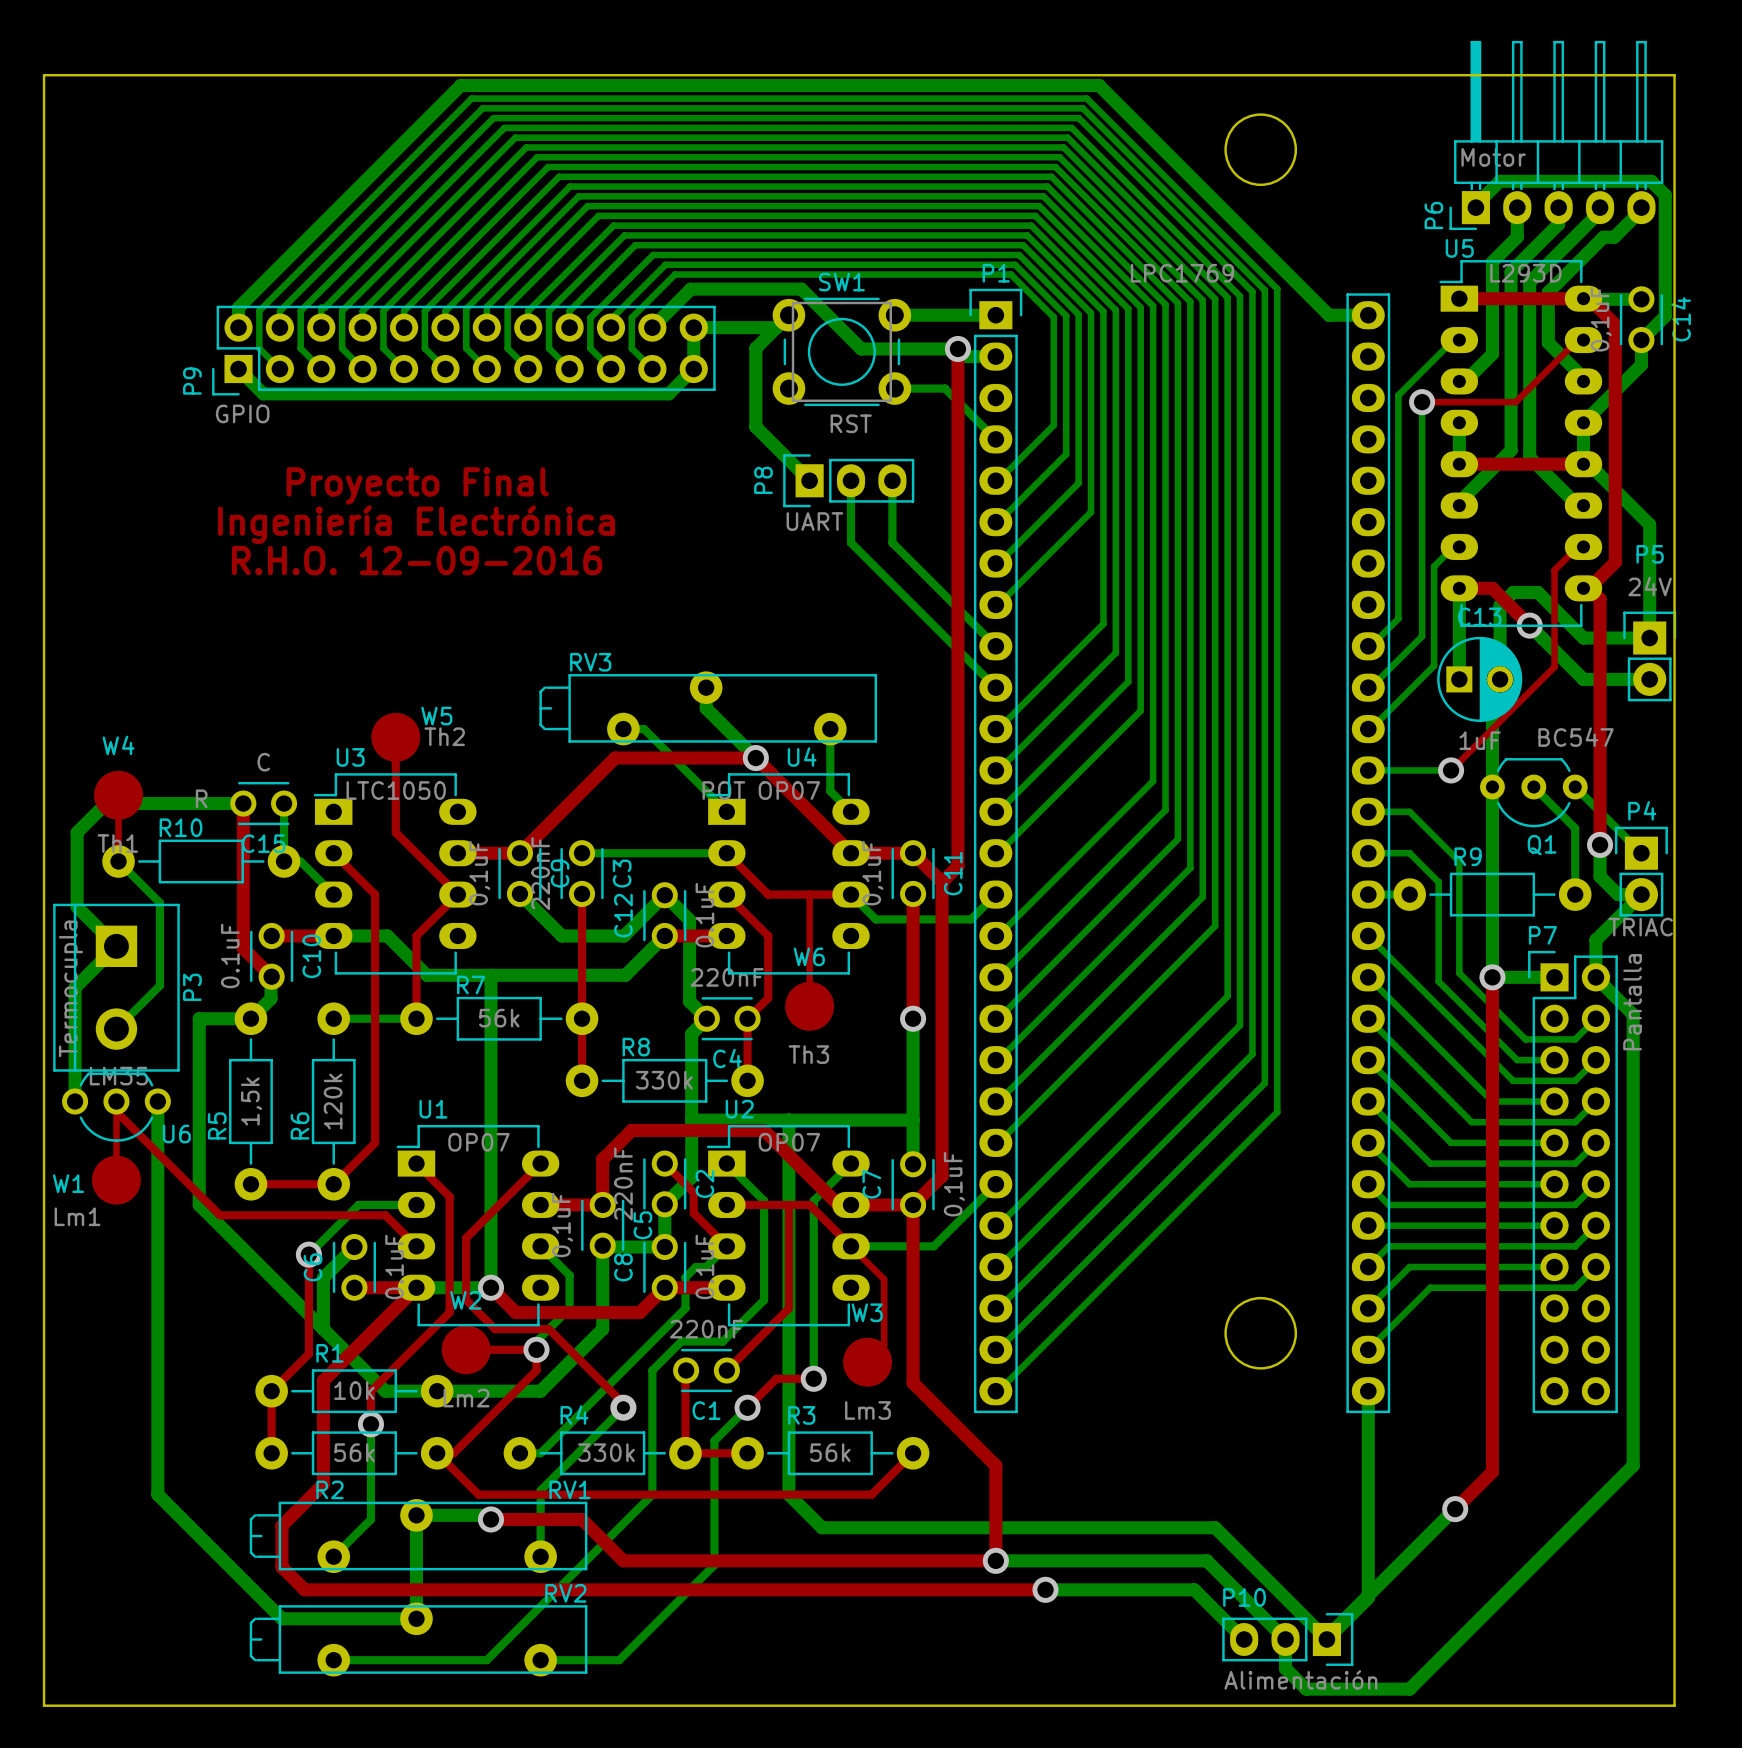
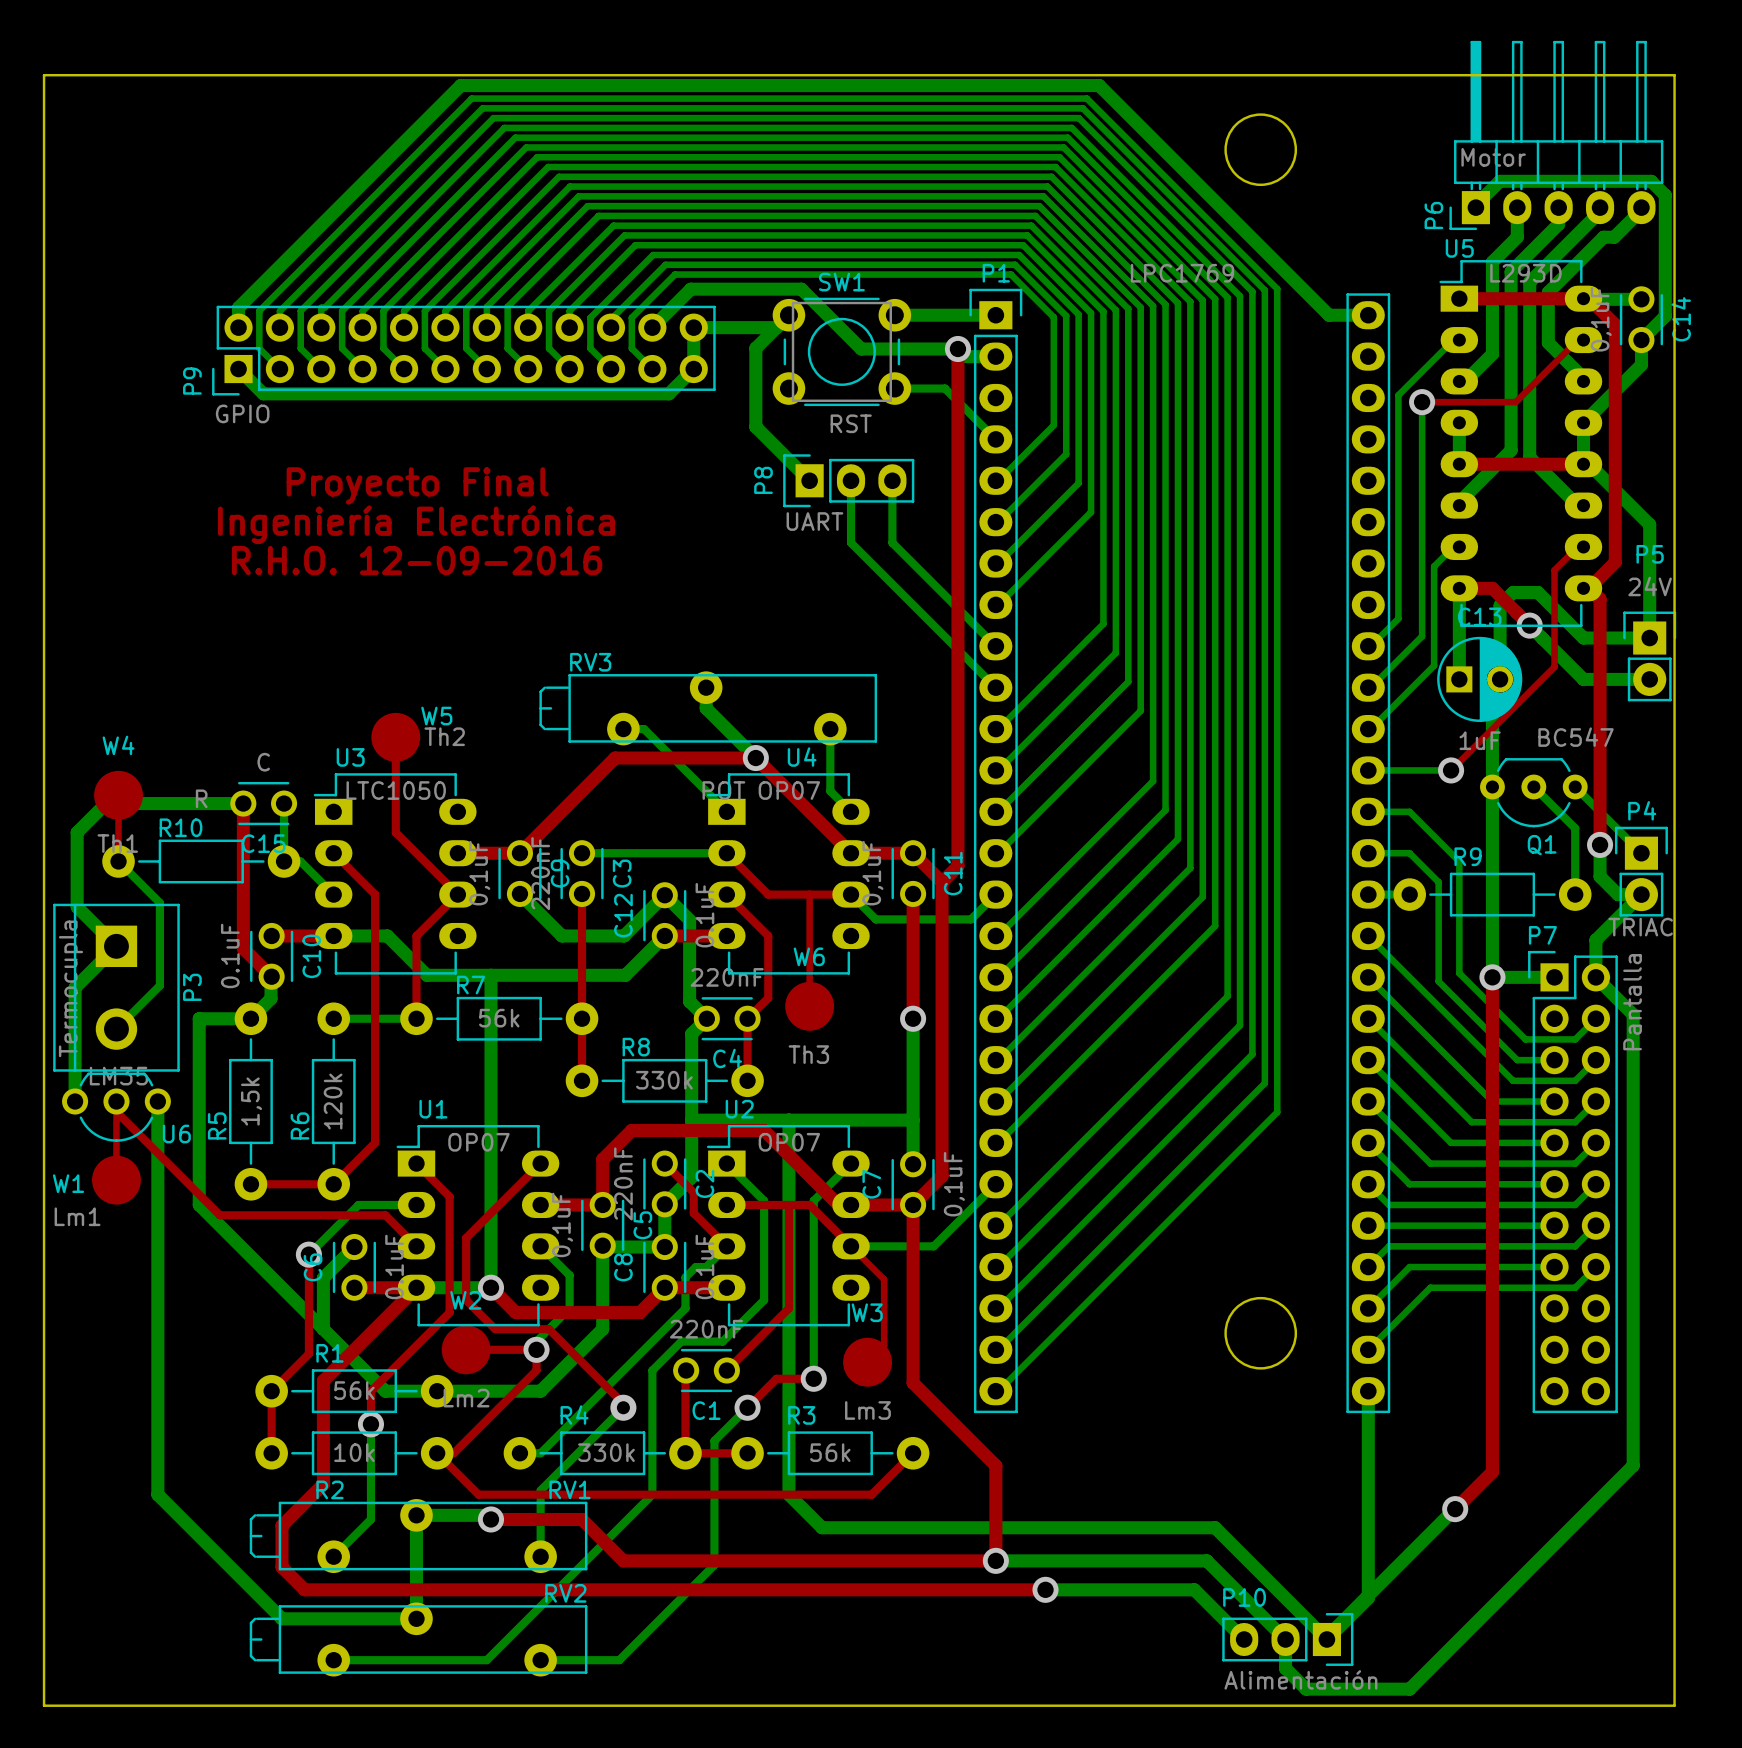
R1 value position: 10k (354, 1390) -> 10k (354, 1452)
R2 value position: 56k (354, 1452) -> 56k (354, 1390)

